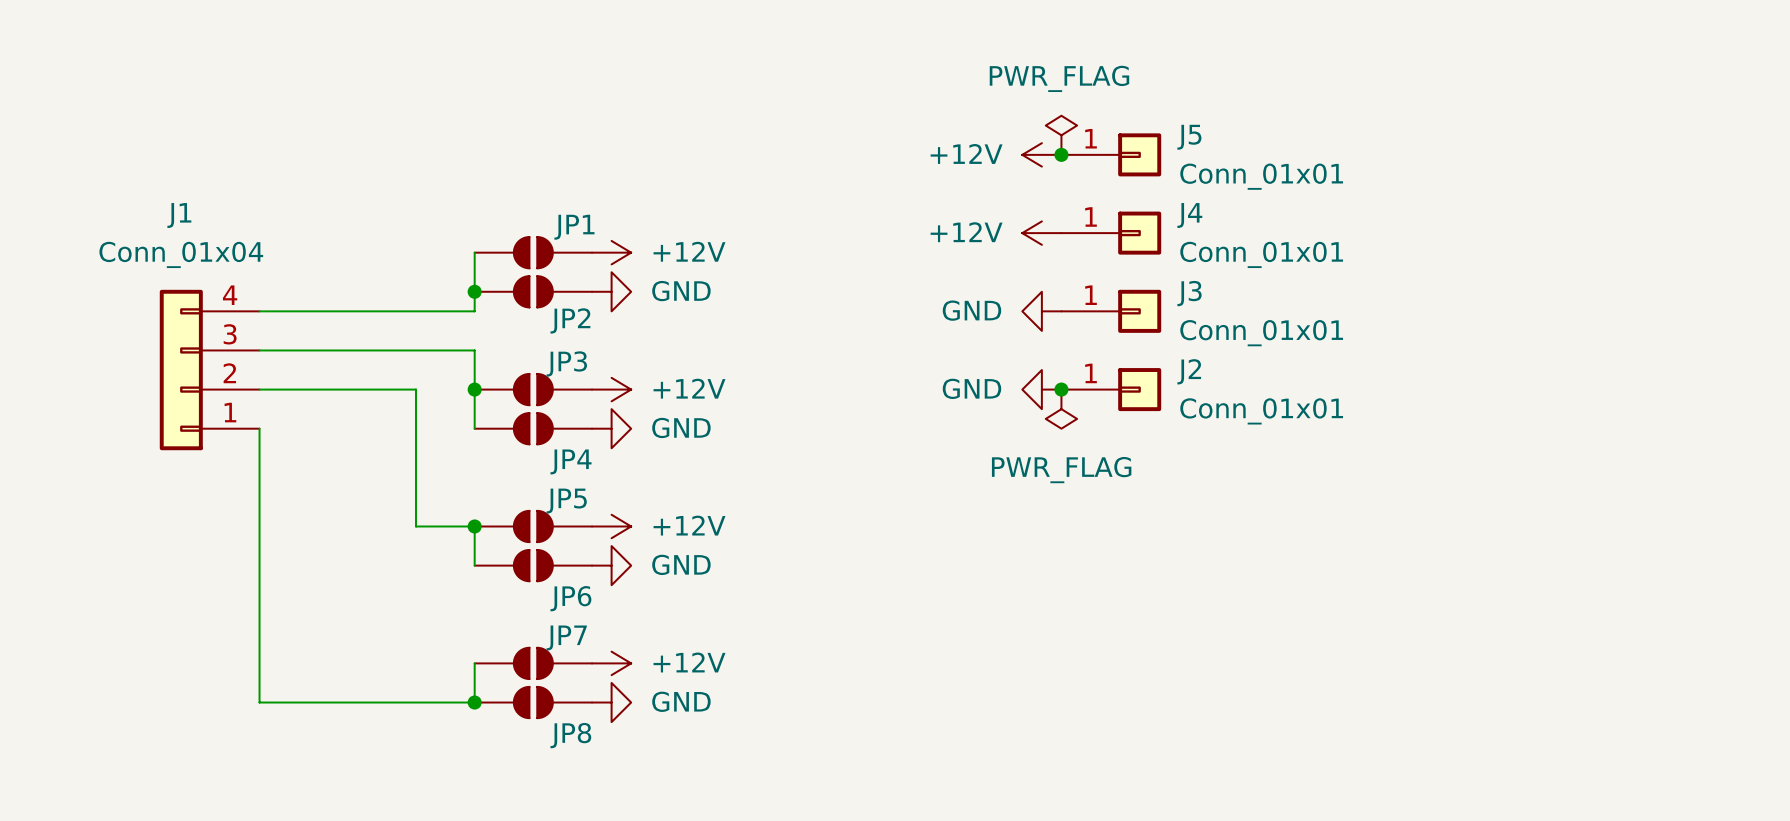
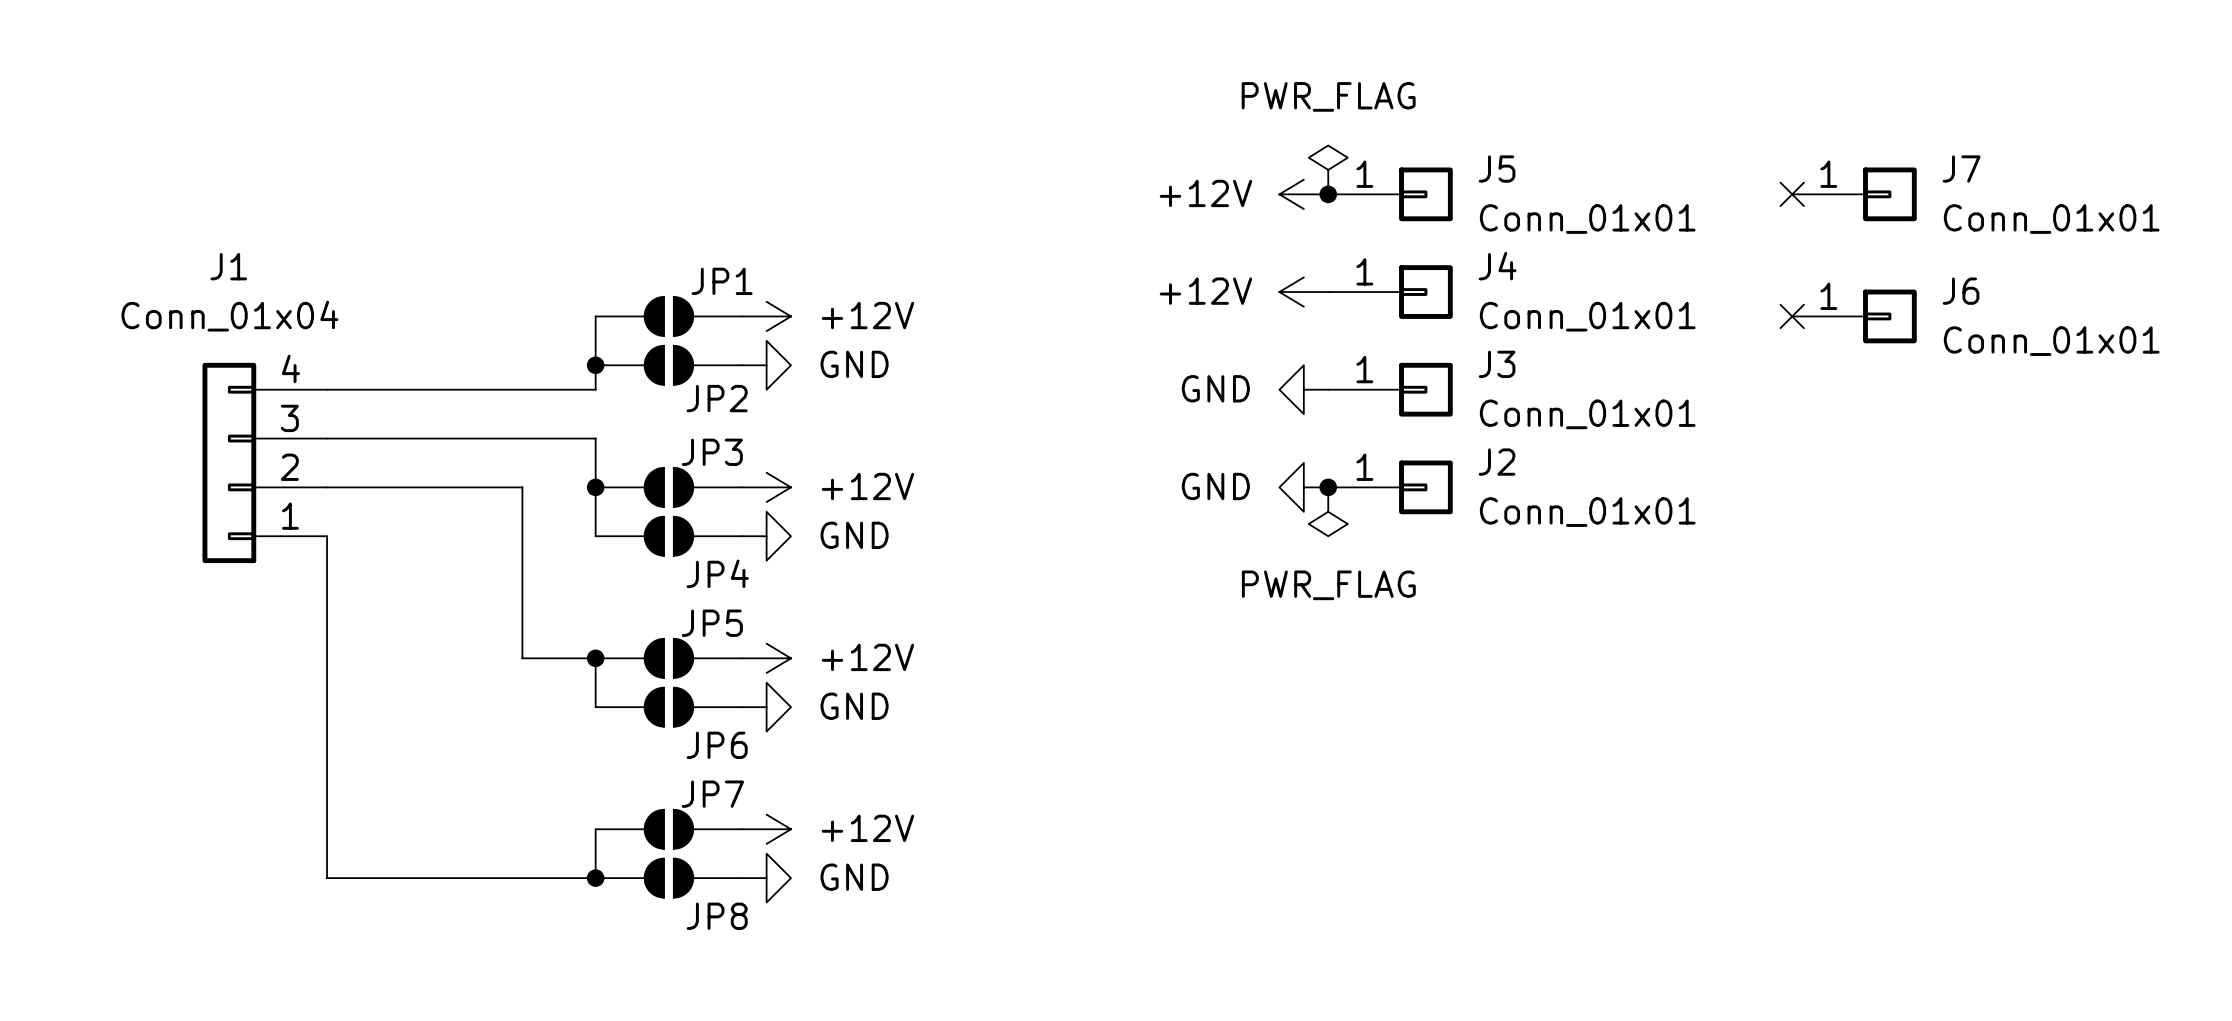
no-connect mark: none -> (1792, 194)
J7: none -> Conn_01x01 (1854, 194)
no-connect mark: none -> (1792, 316)
J6: none -> Conn_01x01 (1854, 316)

